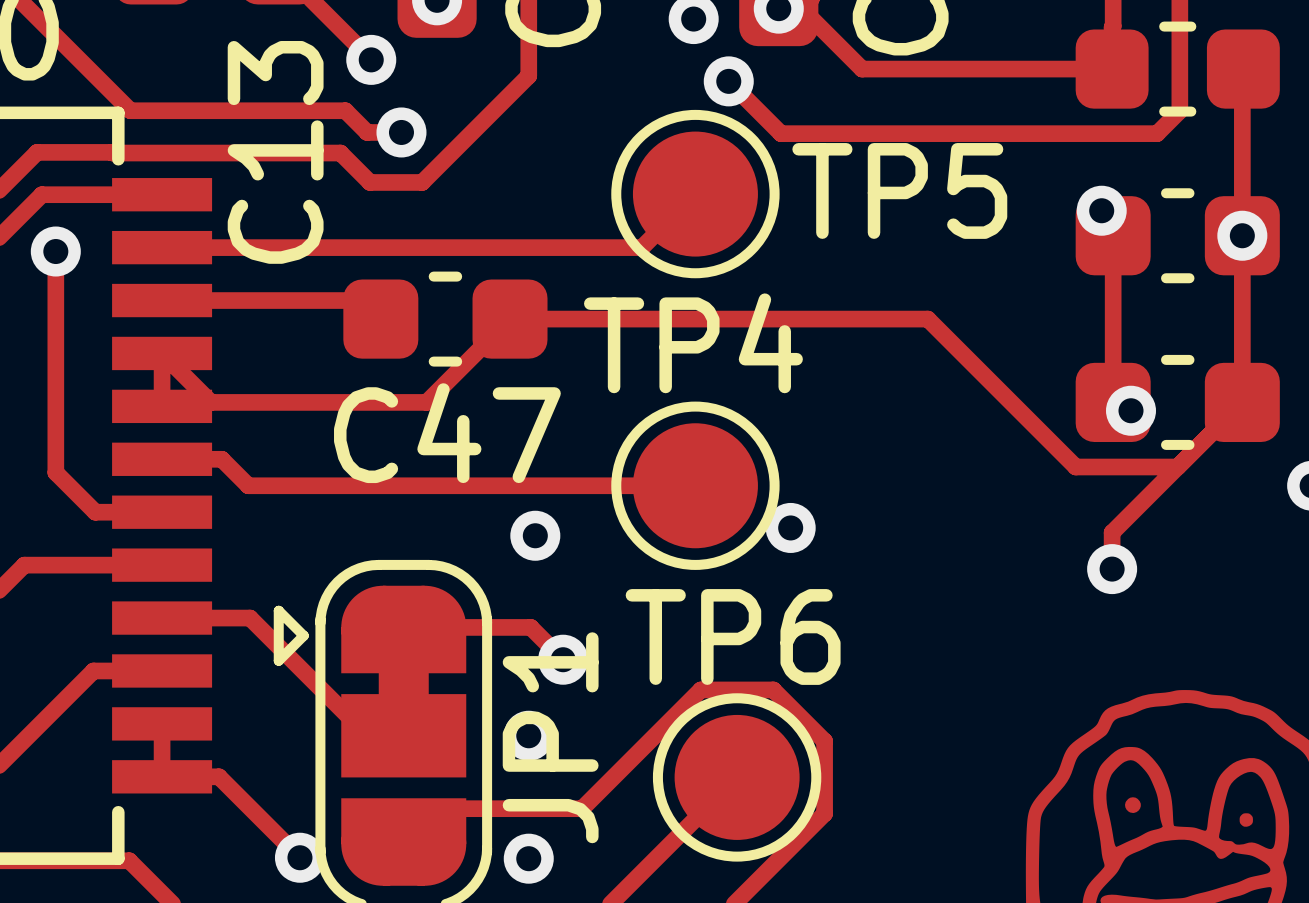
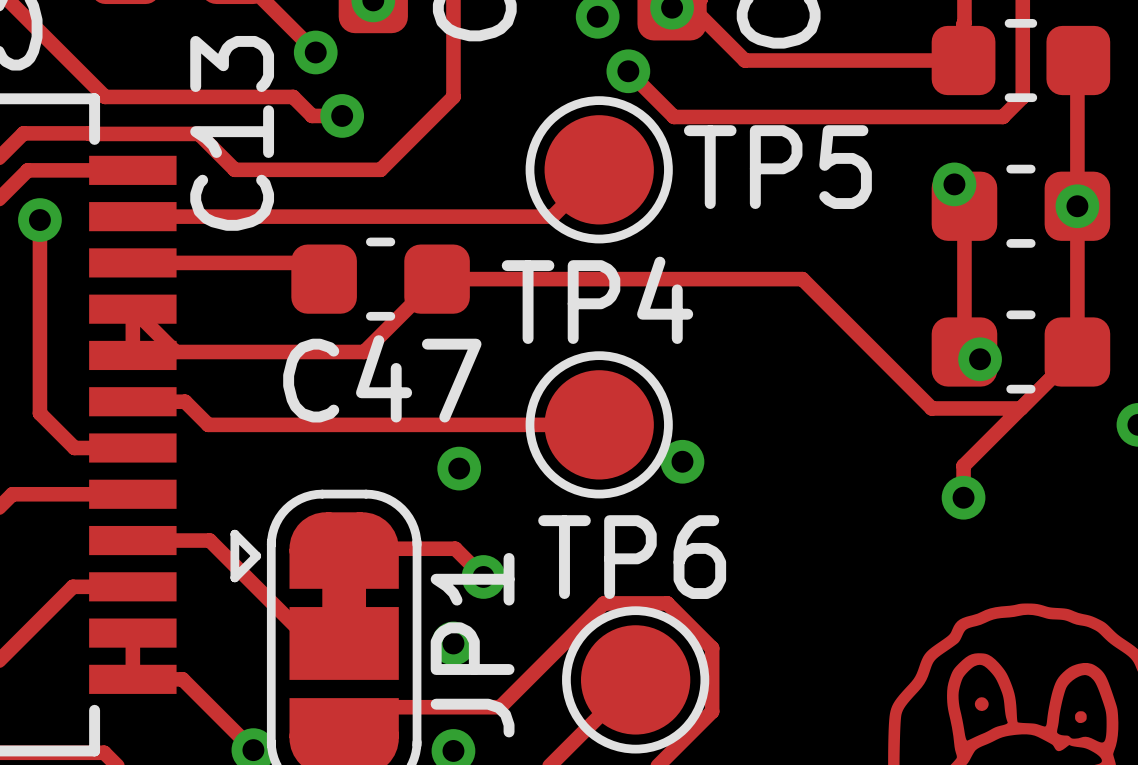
track: (528, 75) (422, 182) (370, 182) (340, 153) (237, 153) -> (453, 66) (453, 96) (380, 169) (234, 169) (198, 133)

